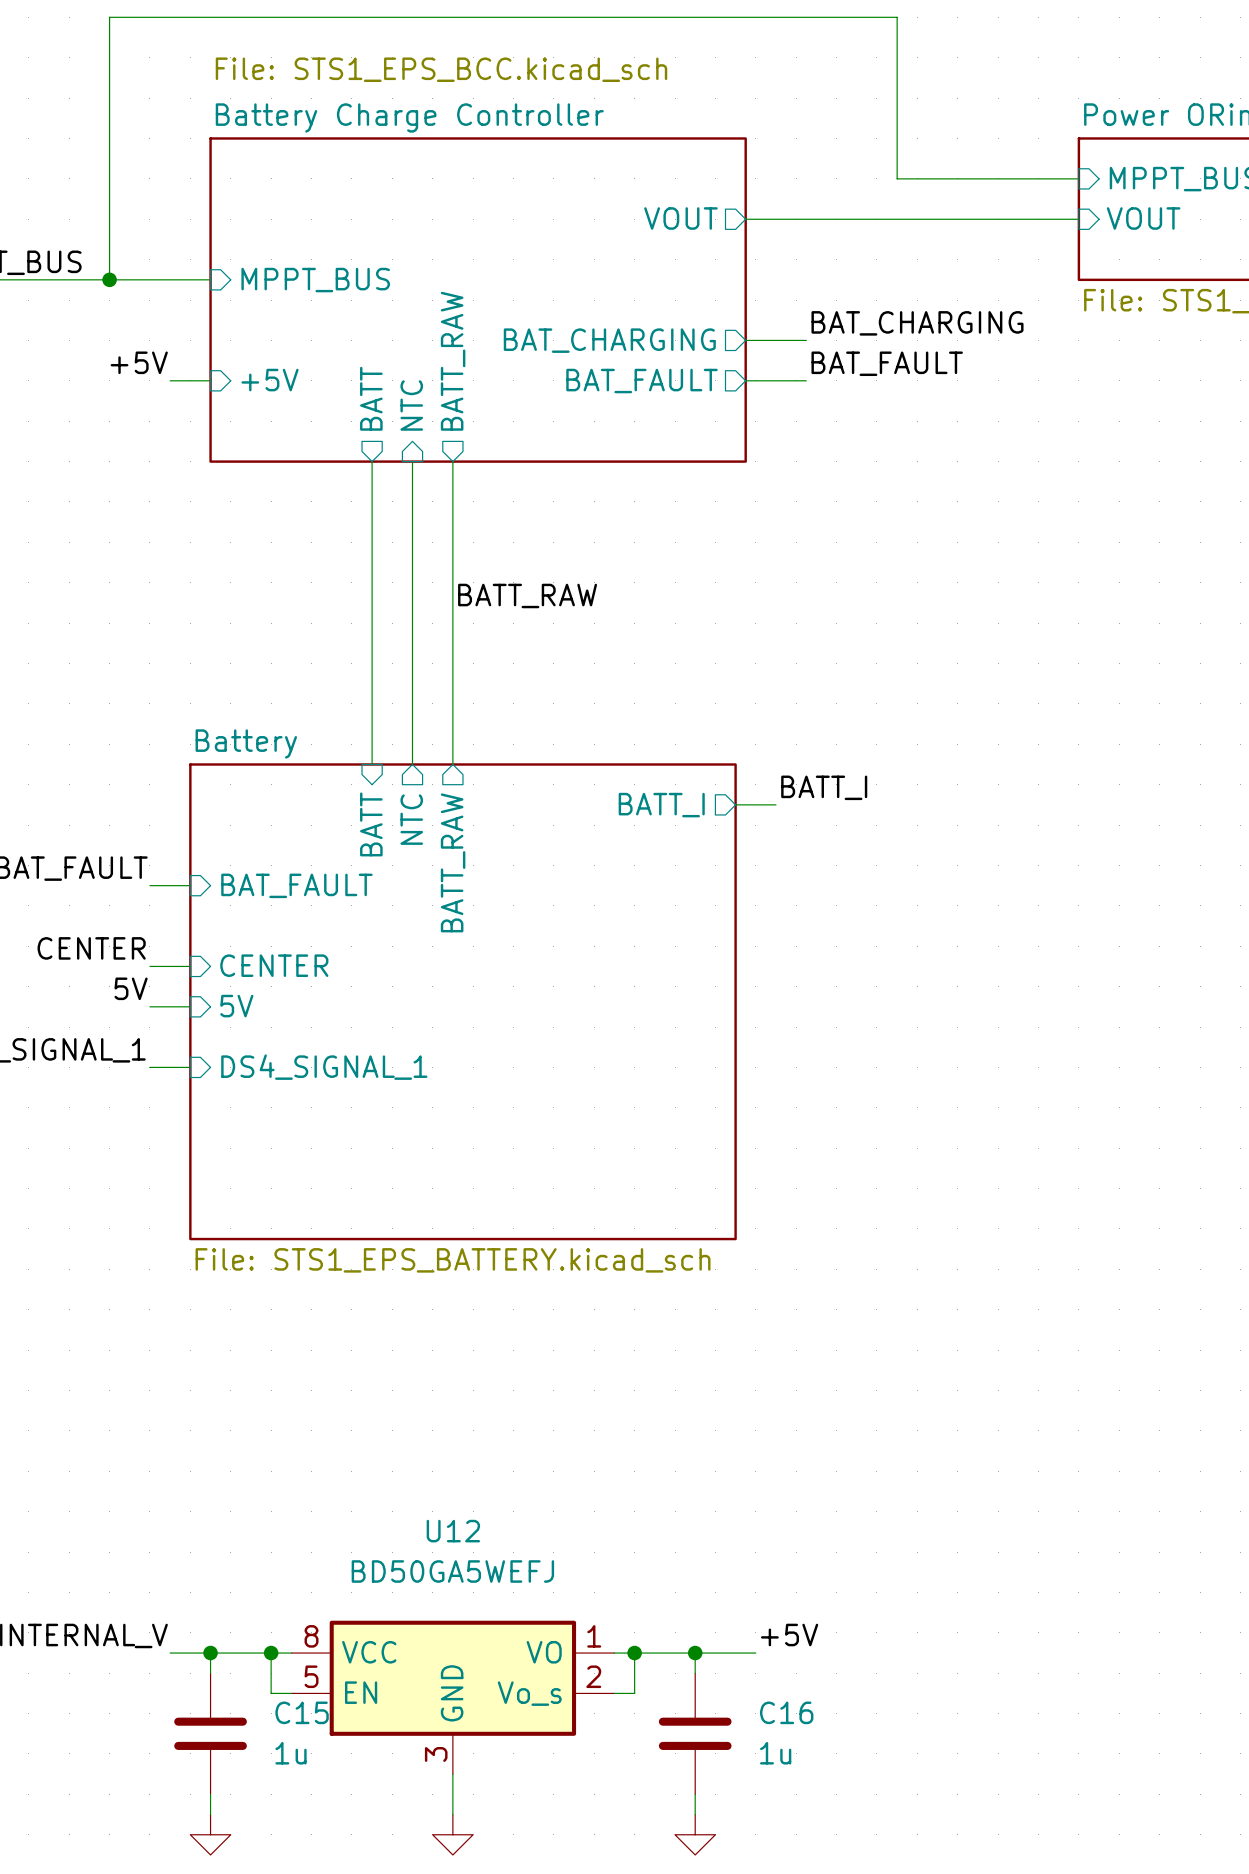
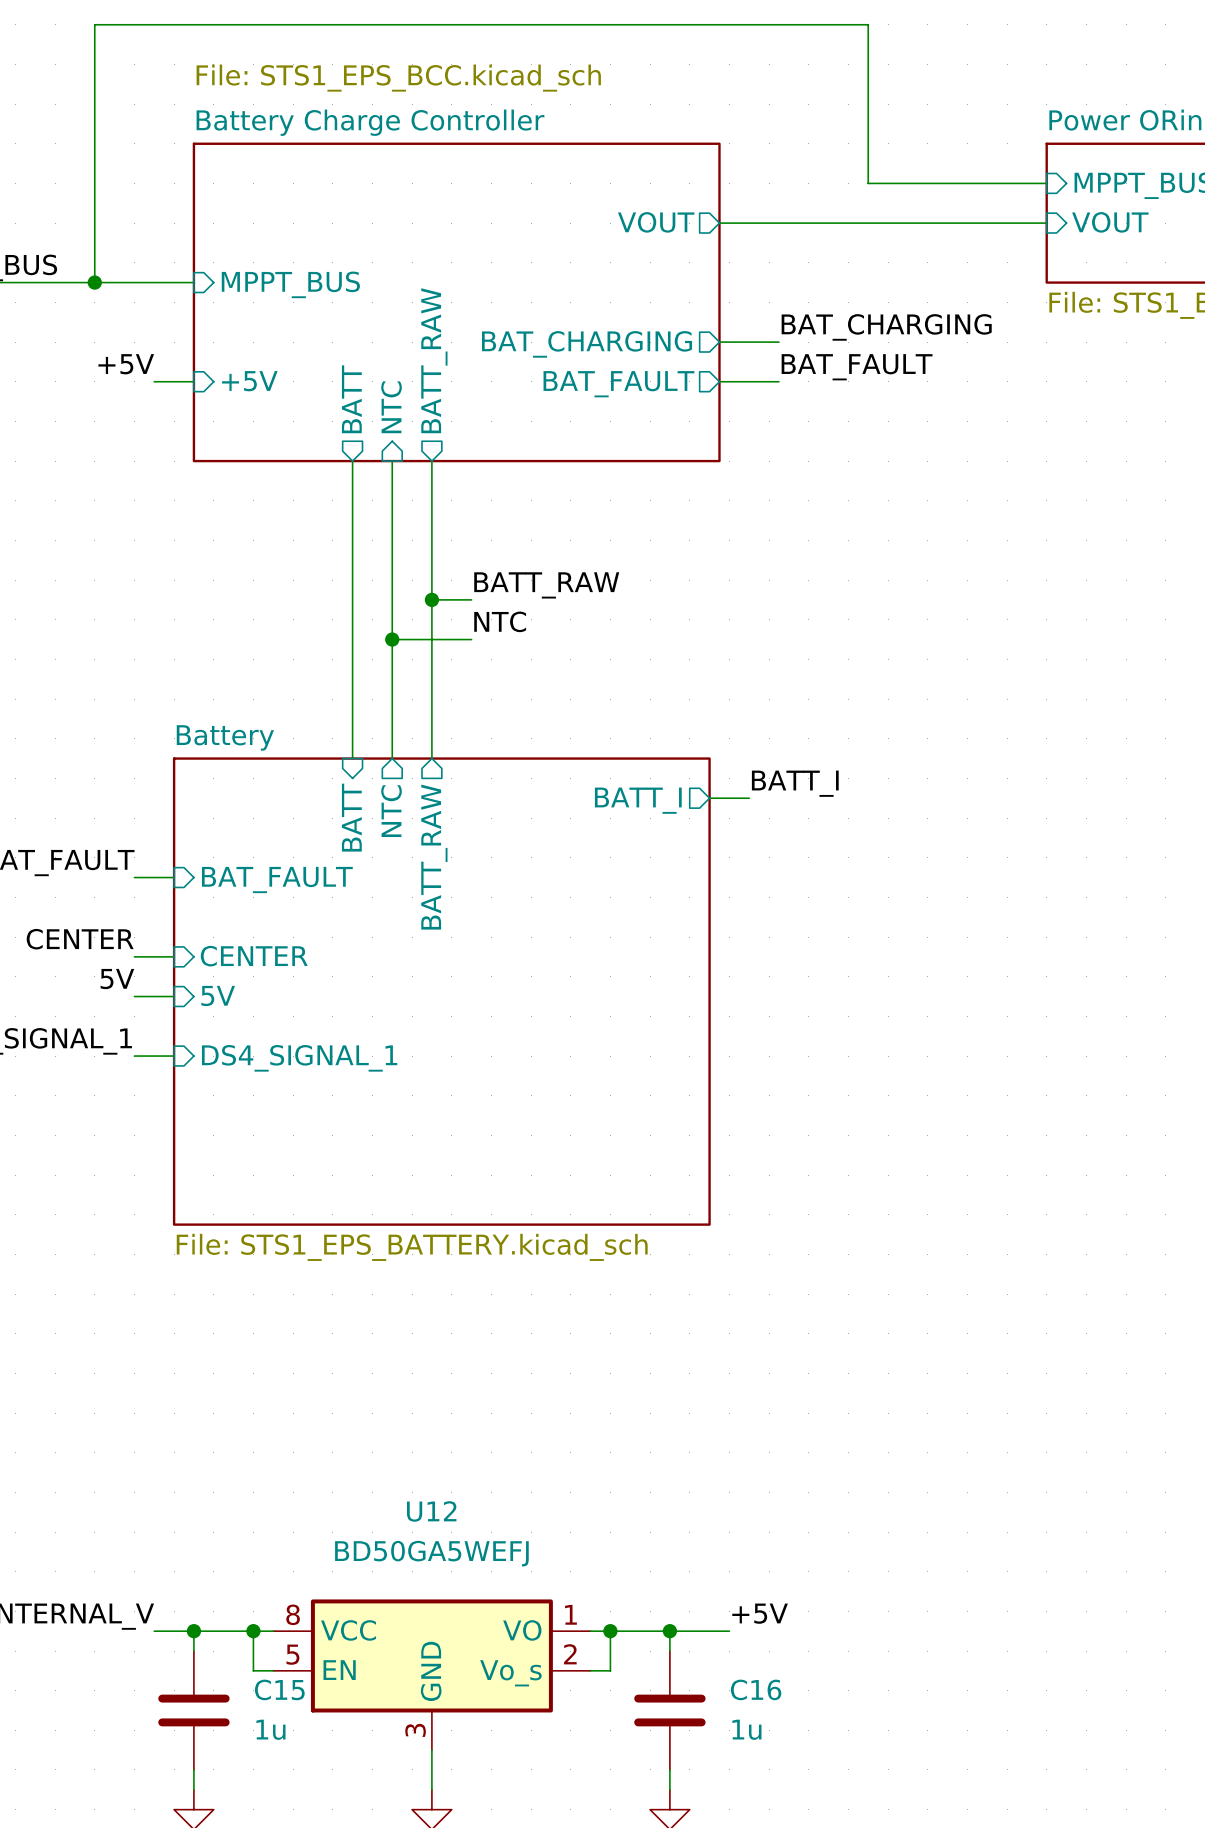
label position: BATT_RAW (527, 595) -> BATT_RAW (546, 585)
wire: none -> (431, 599) (471, 599)
junction: none -> (431, 599)
label: none -> NTC (500, 621)
wire: none -> (392, 639) (471, 639)
junction: none -> (392, 639)

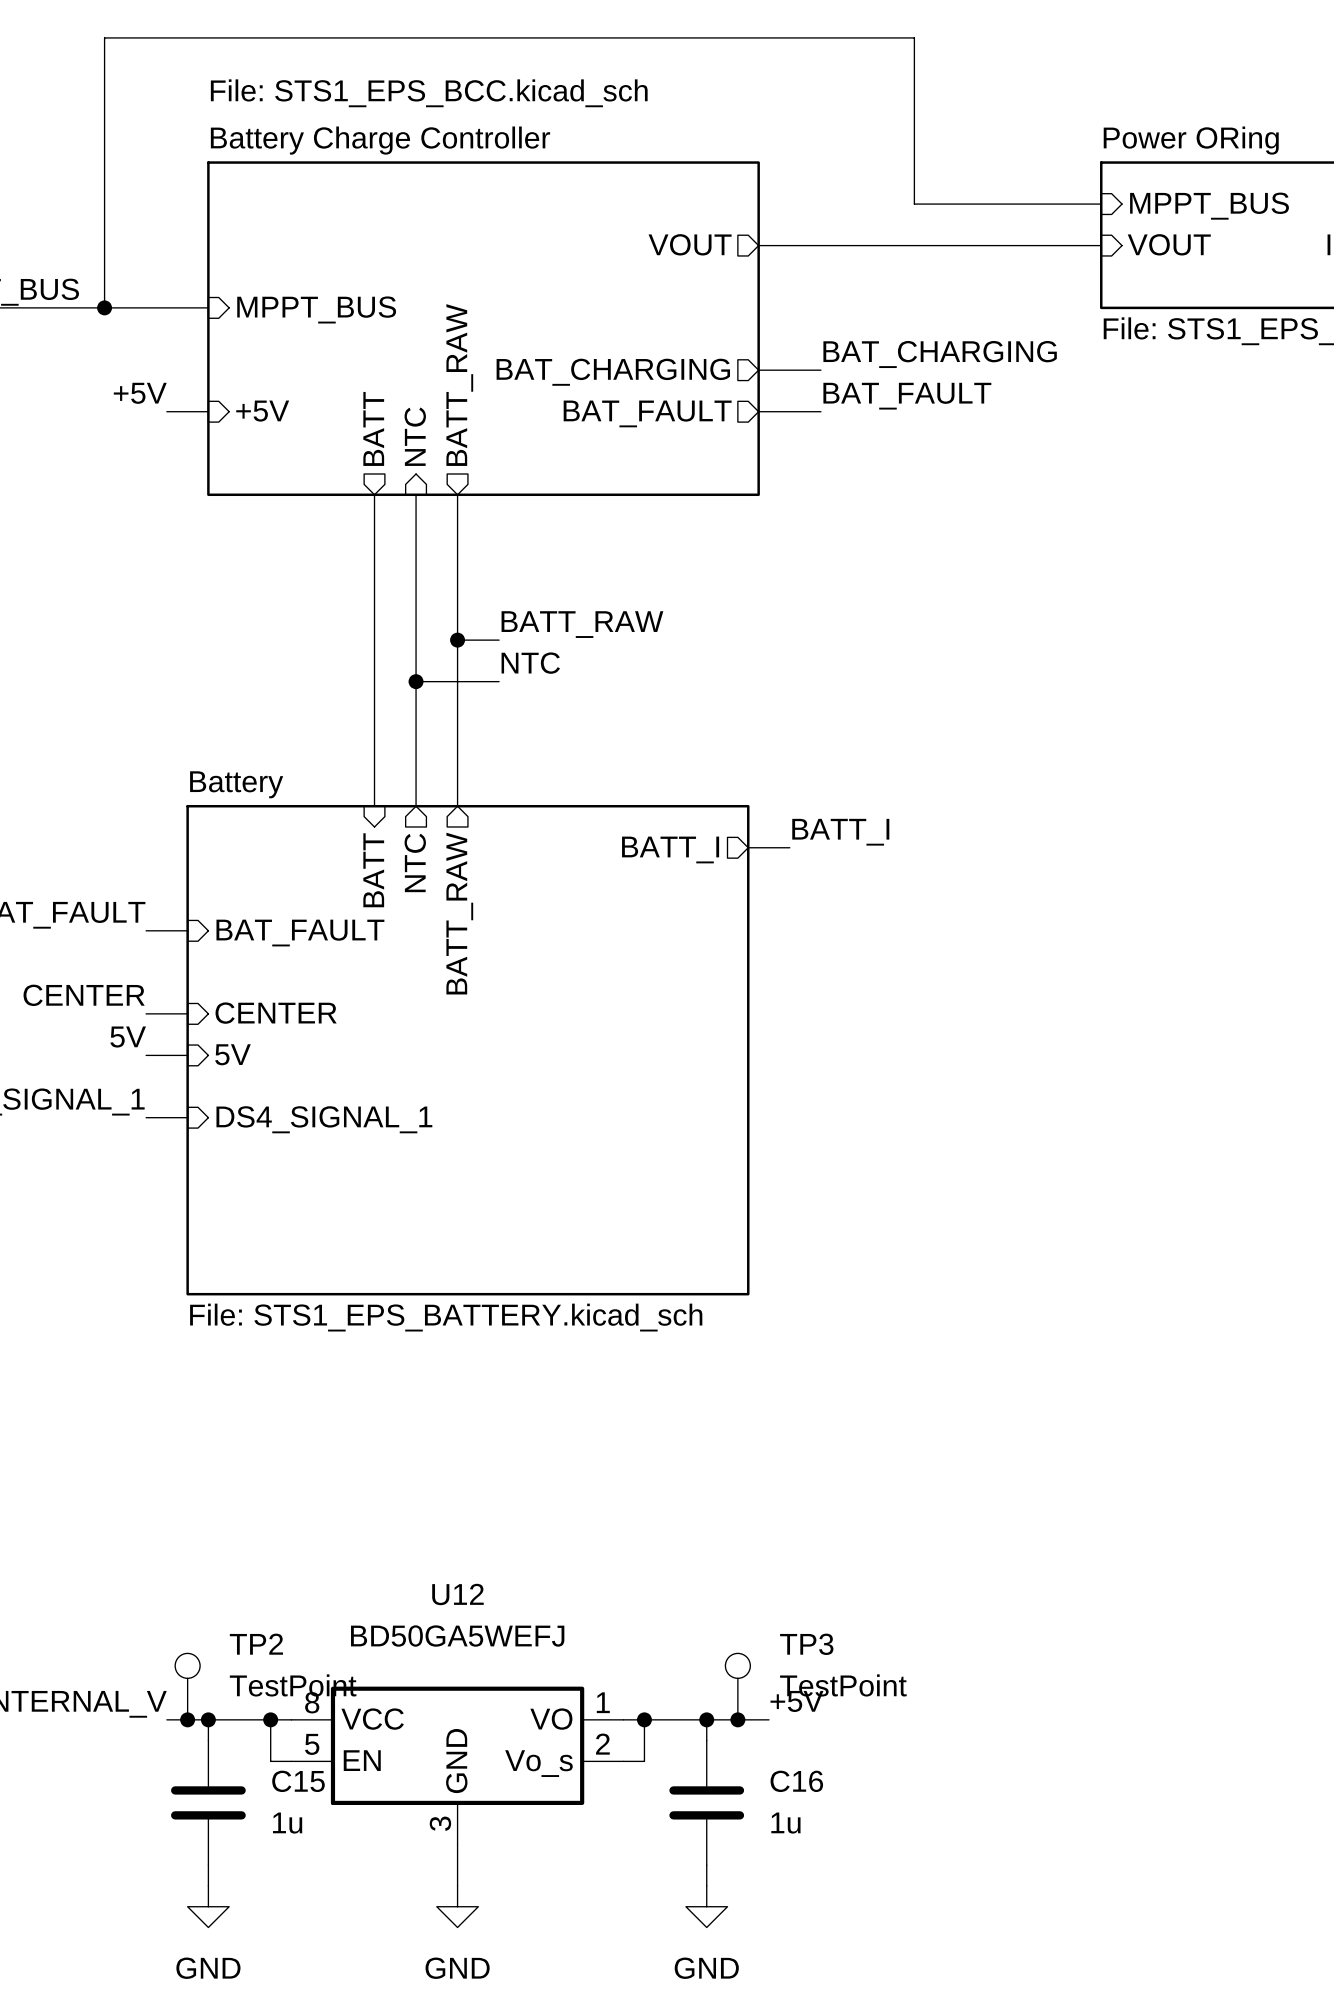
TP2: none -> TestPoint (187, 1686)
TP3: none -> TestPoint (737, 1686)
junction: none -> (187, 1719)
junction: none -> (737, 1719)

